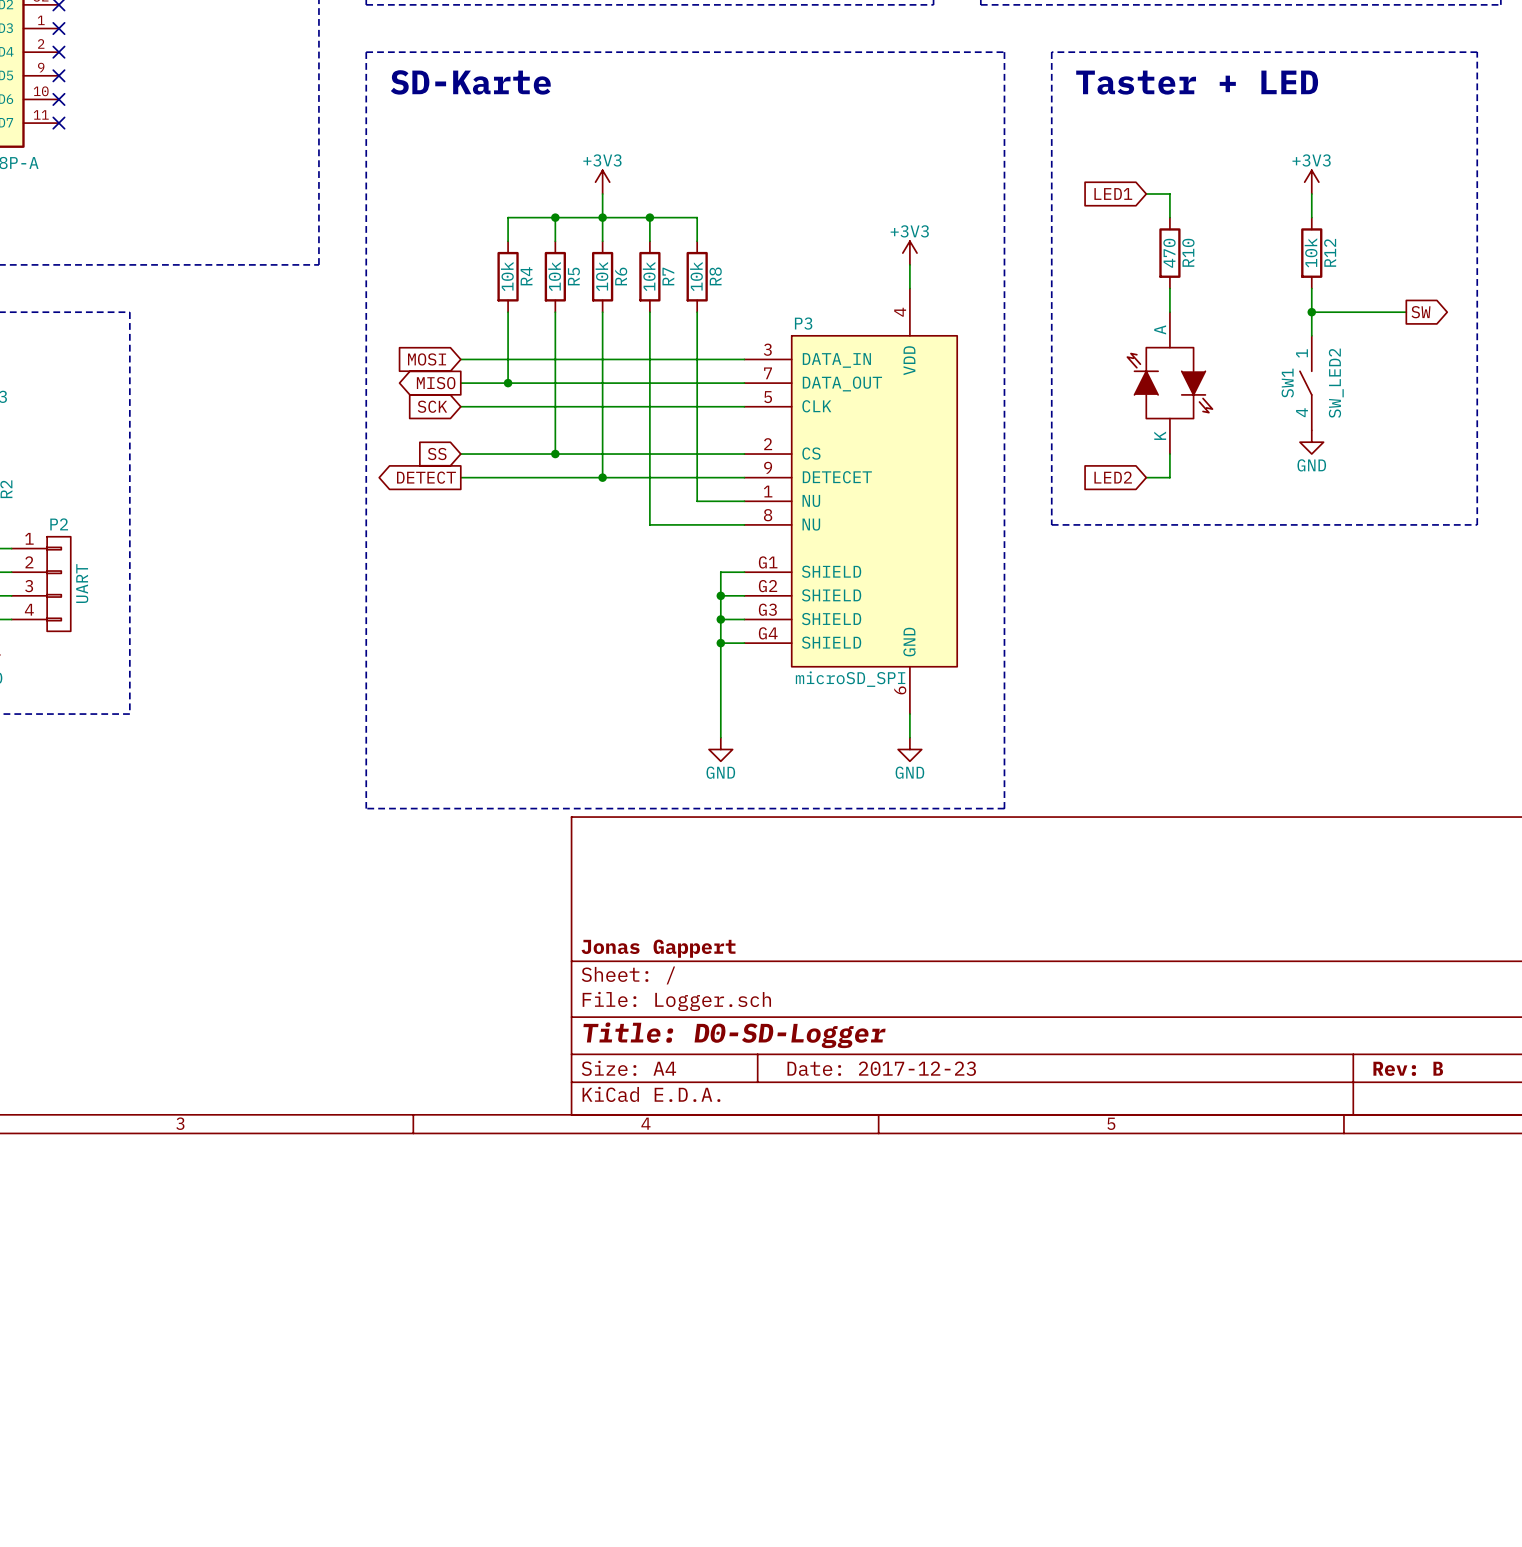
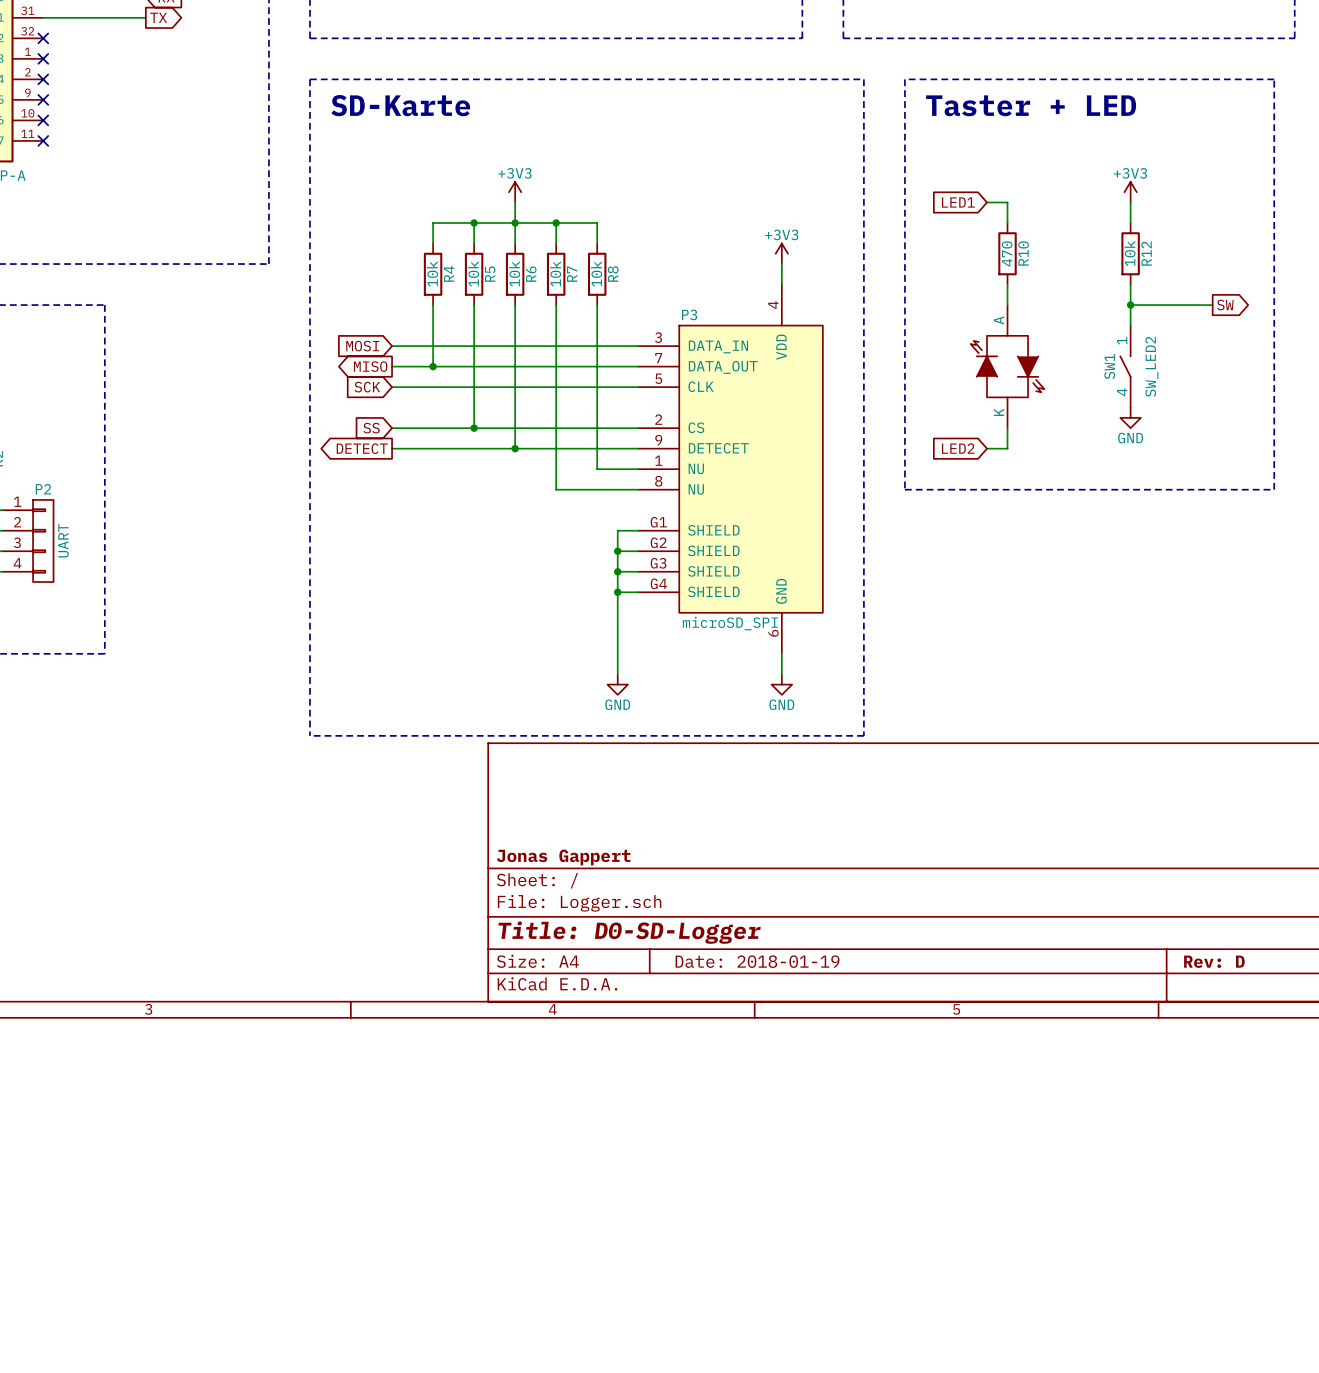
title block: Date: 2017-12-23 (881, 1068) -> Date: 2018-01-19 (757, 961)
title block: Rev: B (1408, 1068) -> Rev: D (1214, 961)

